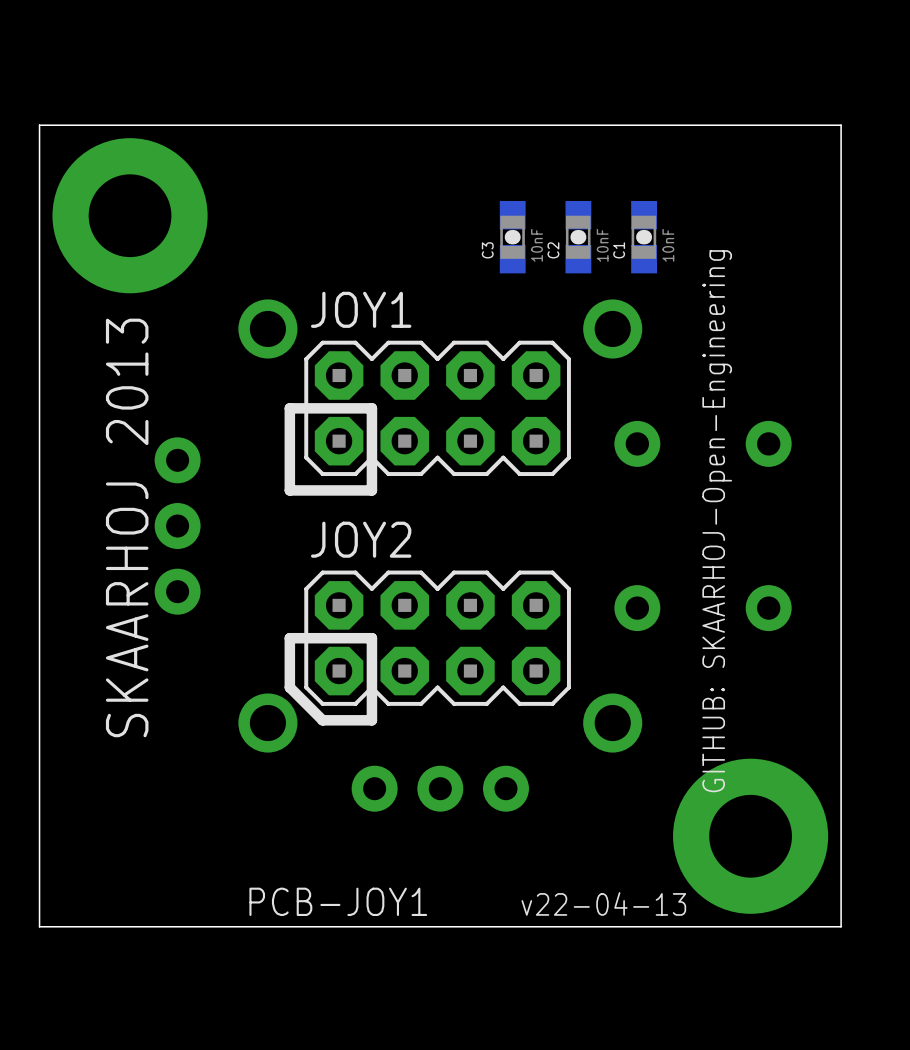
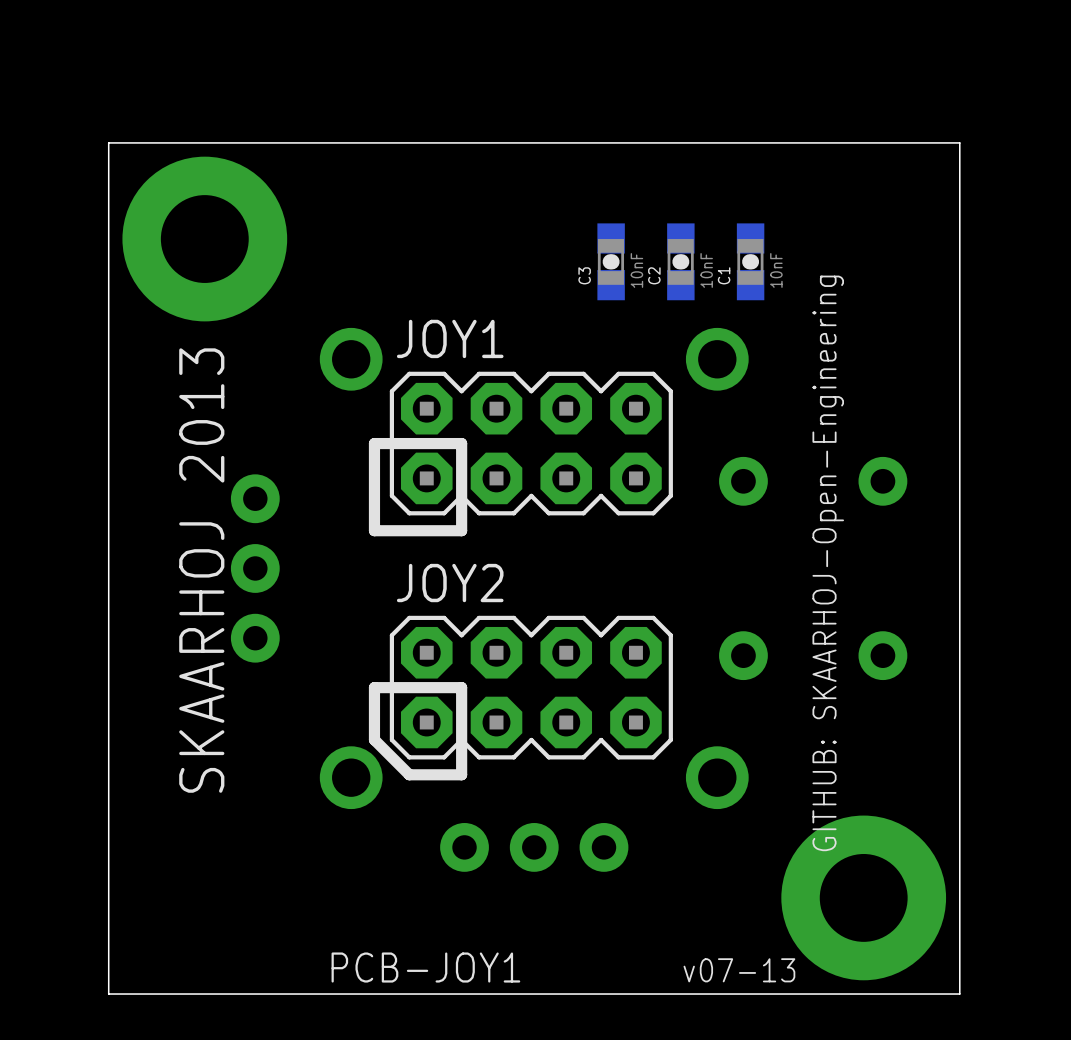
text: v22-04-13 (603, 903) -> v07-13 (739, 970)

